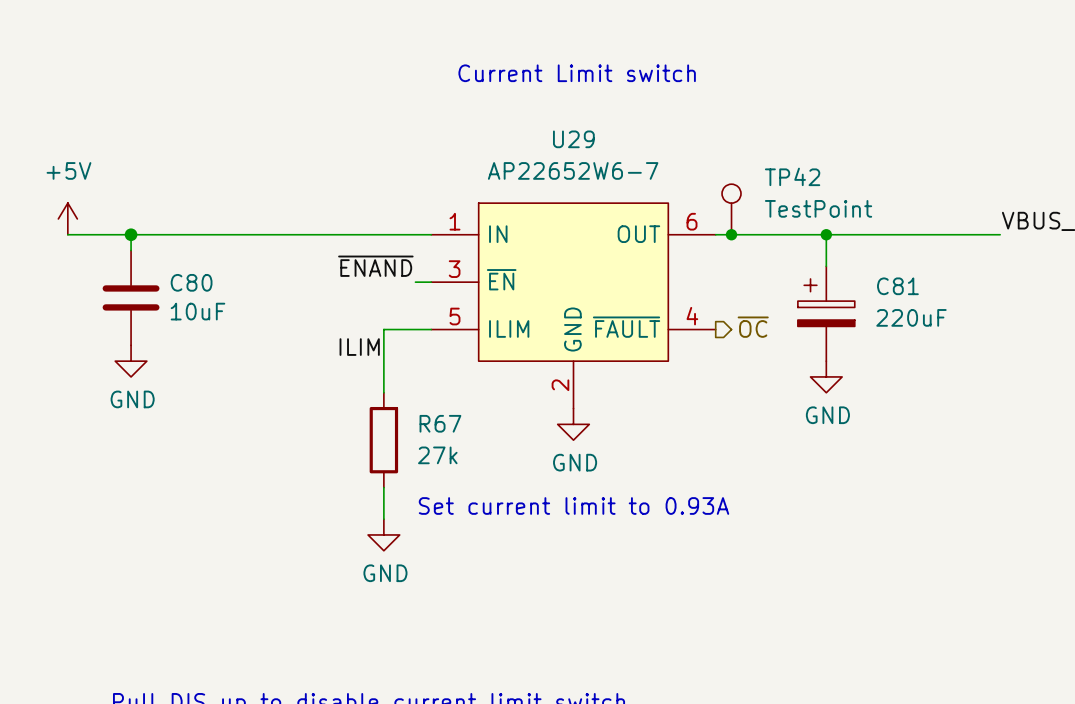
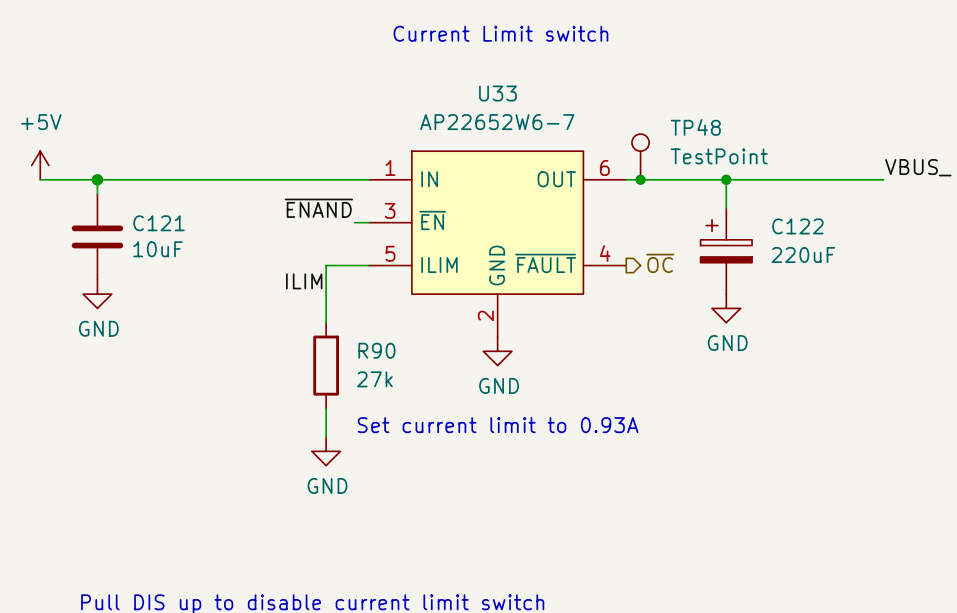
U29 name: U29 (573, 139) -> U33 (497, 93)
TP42 name: TP42 (792, 176) -> TP48 (695, 127)
C80 name: C80 (191, 282) -> C121 (159, 223)
C81 name: C81 (897, 286) -> C122 (797, 226)
R67 name: R67 (440, 423) -> R90 (376, 350)

